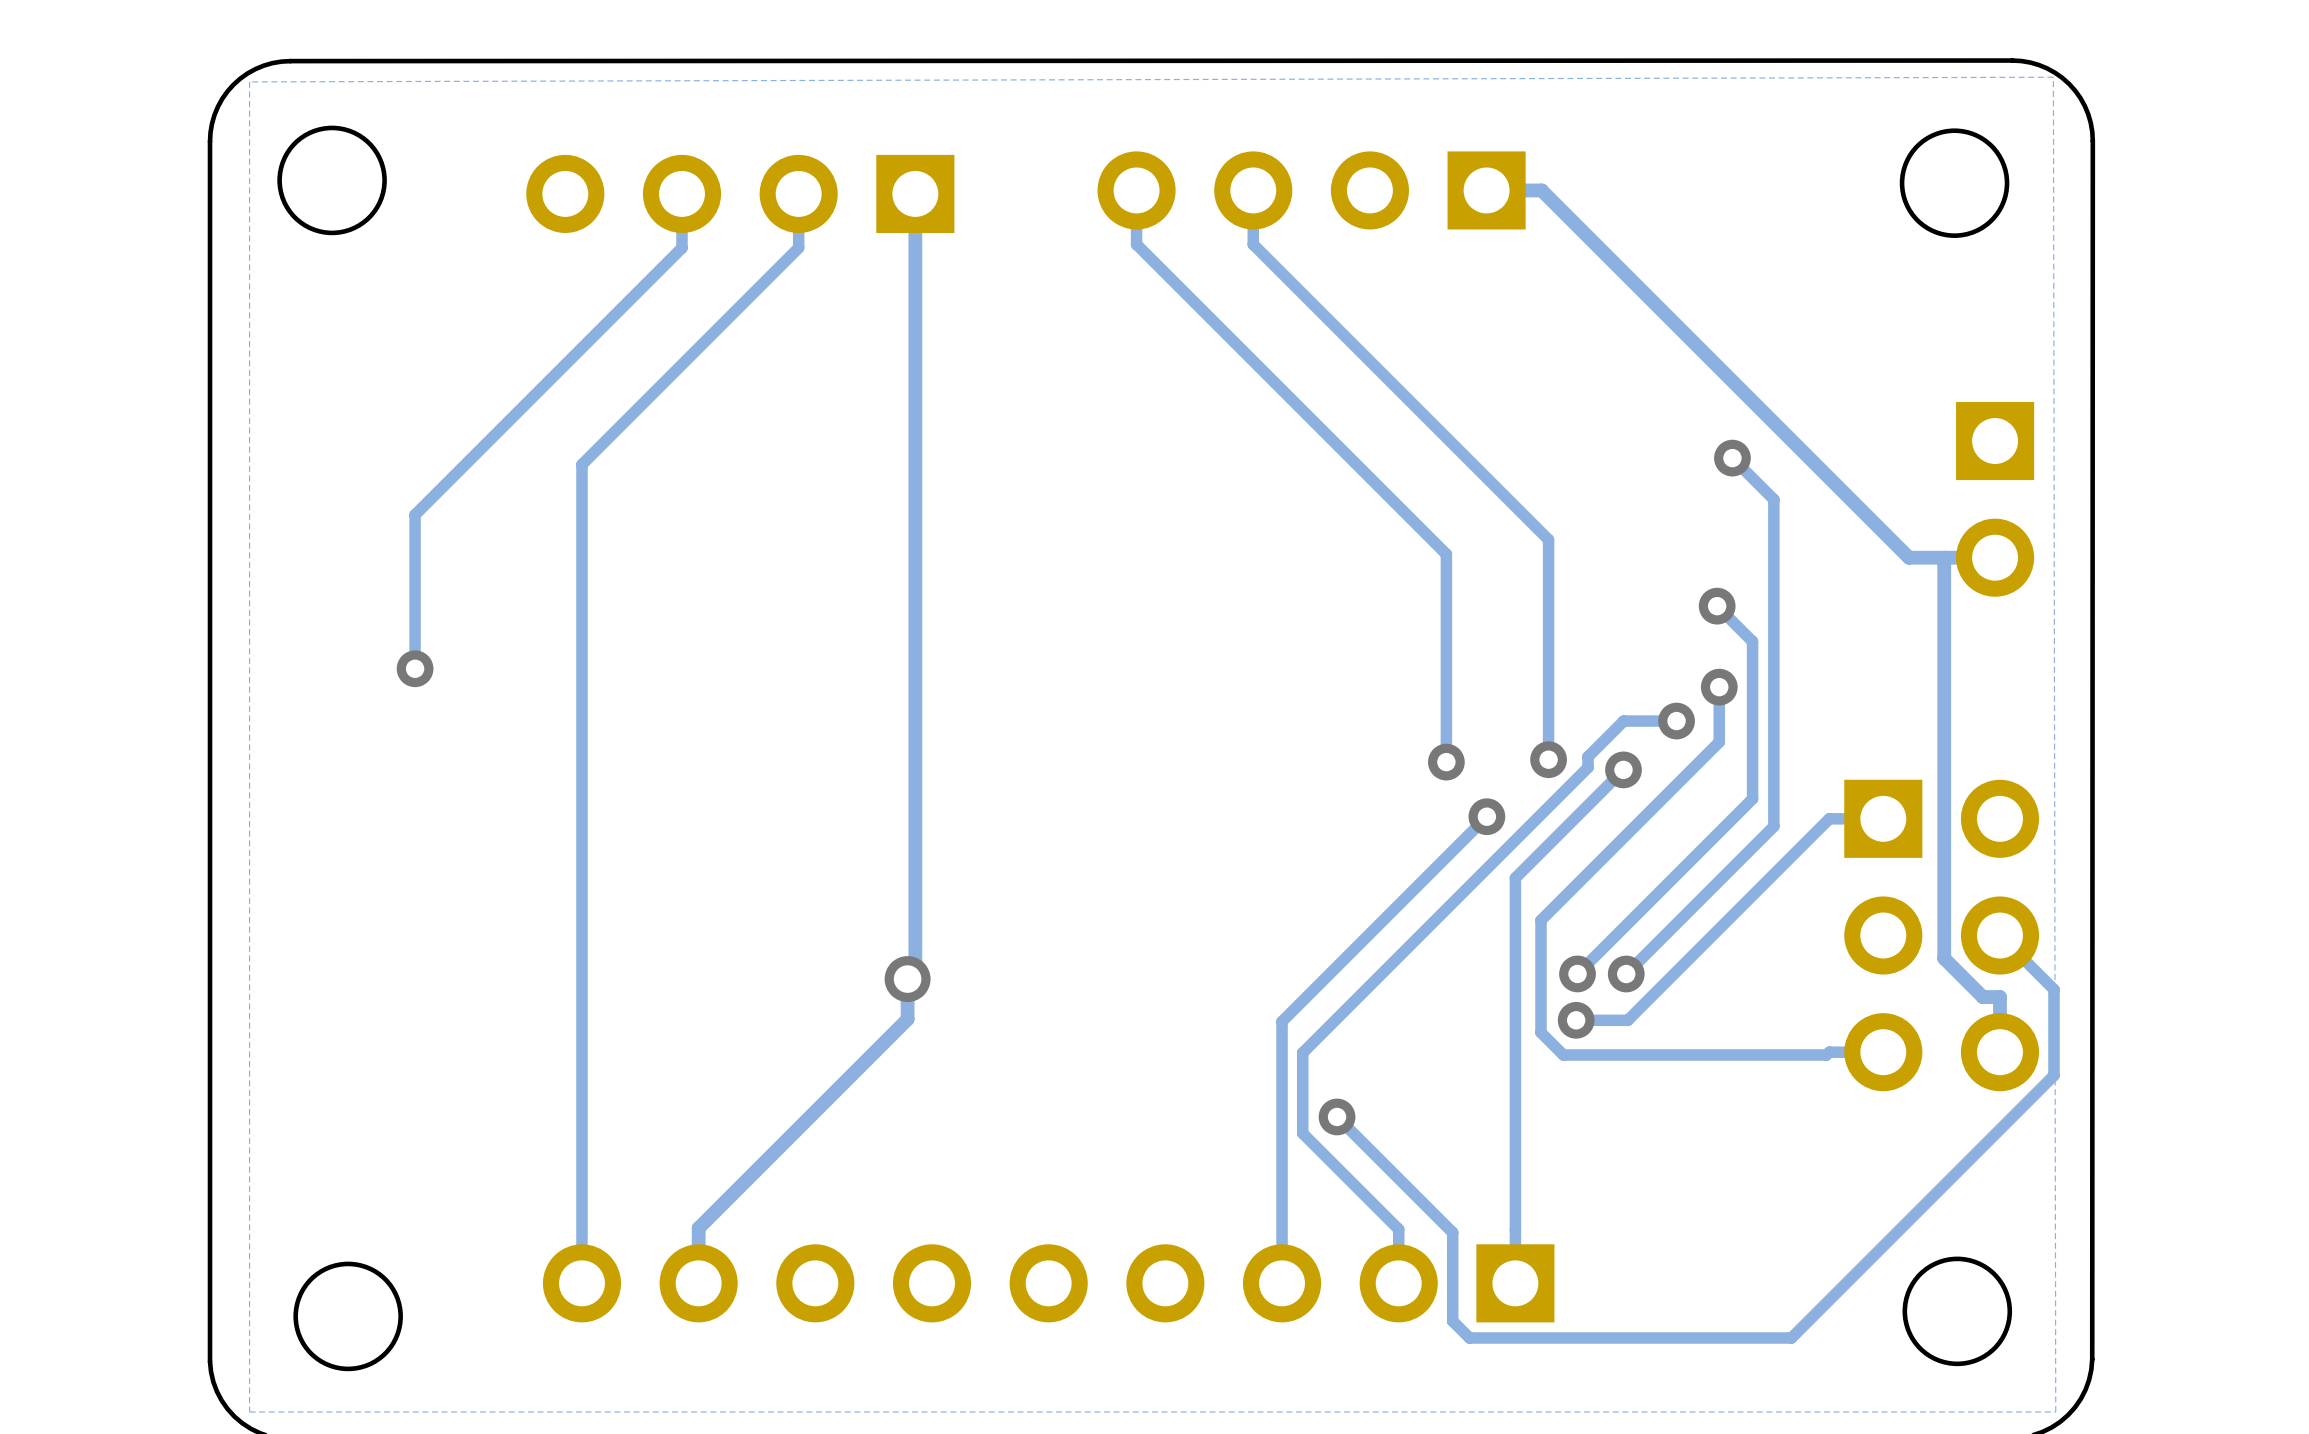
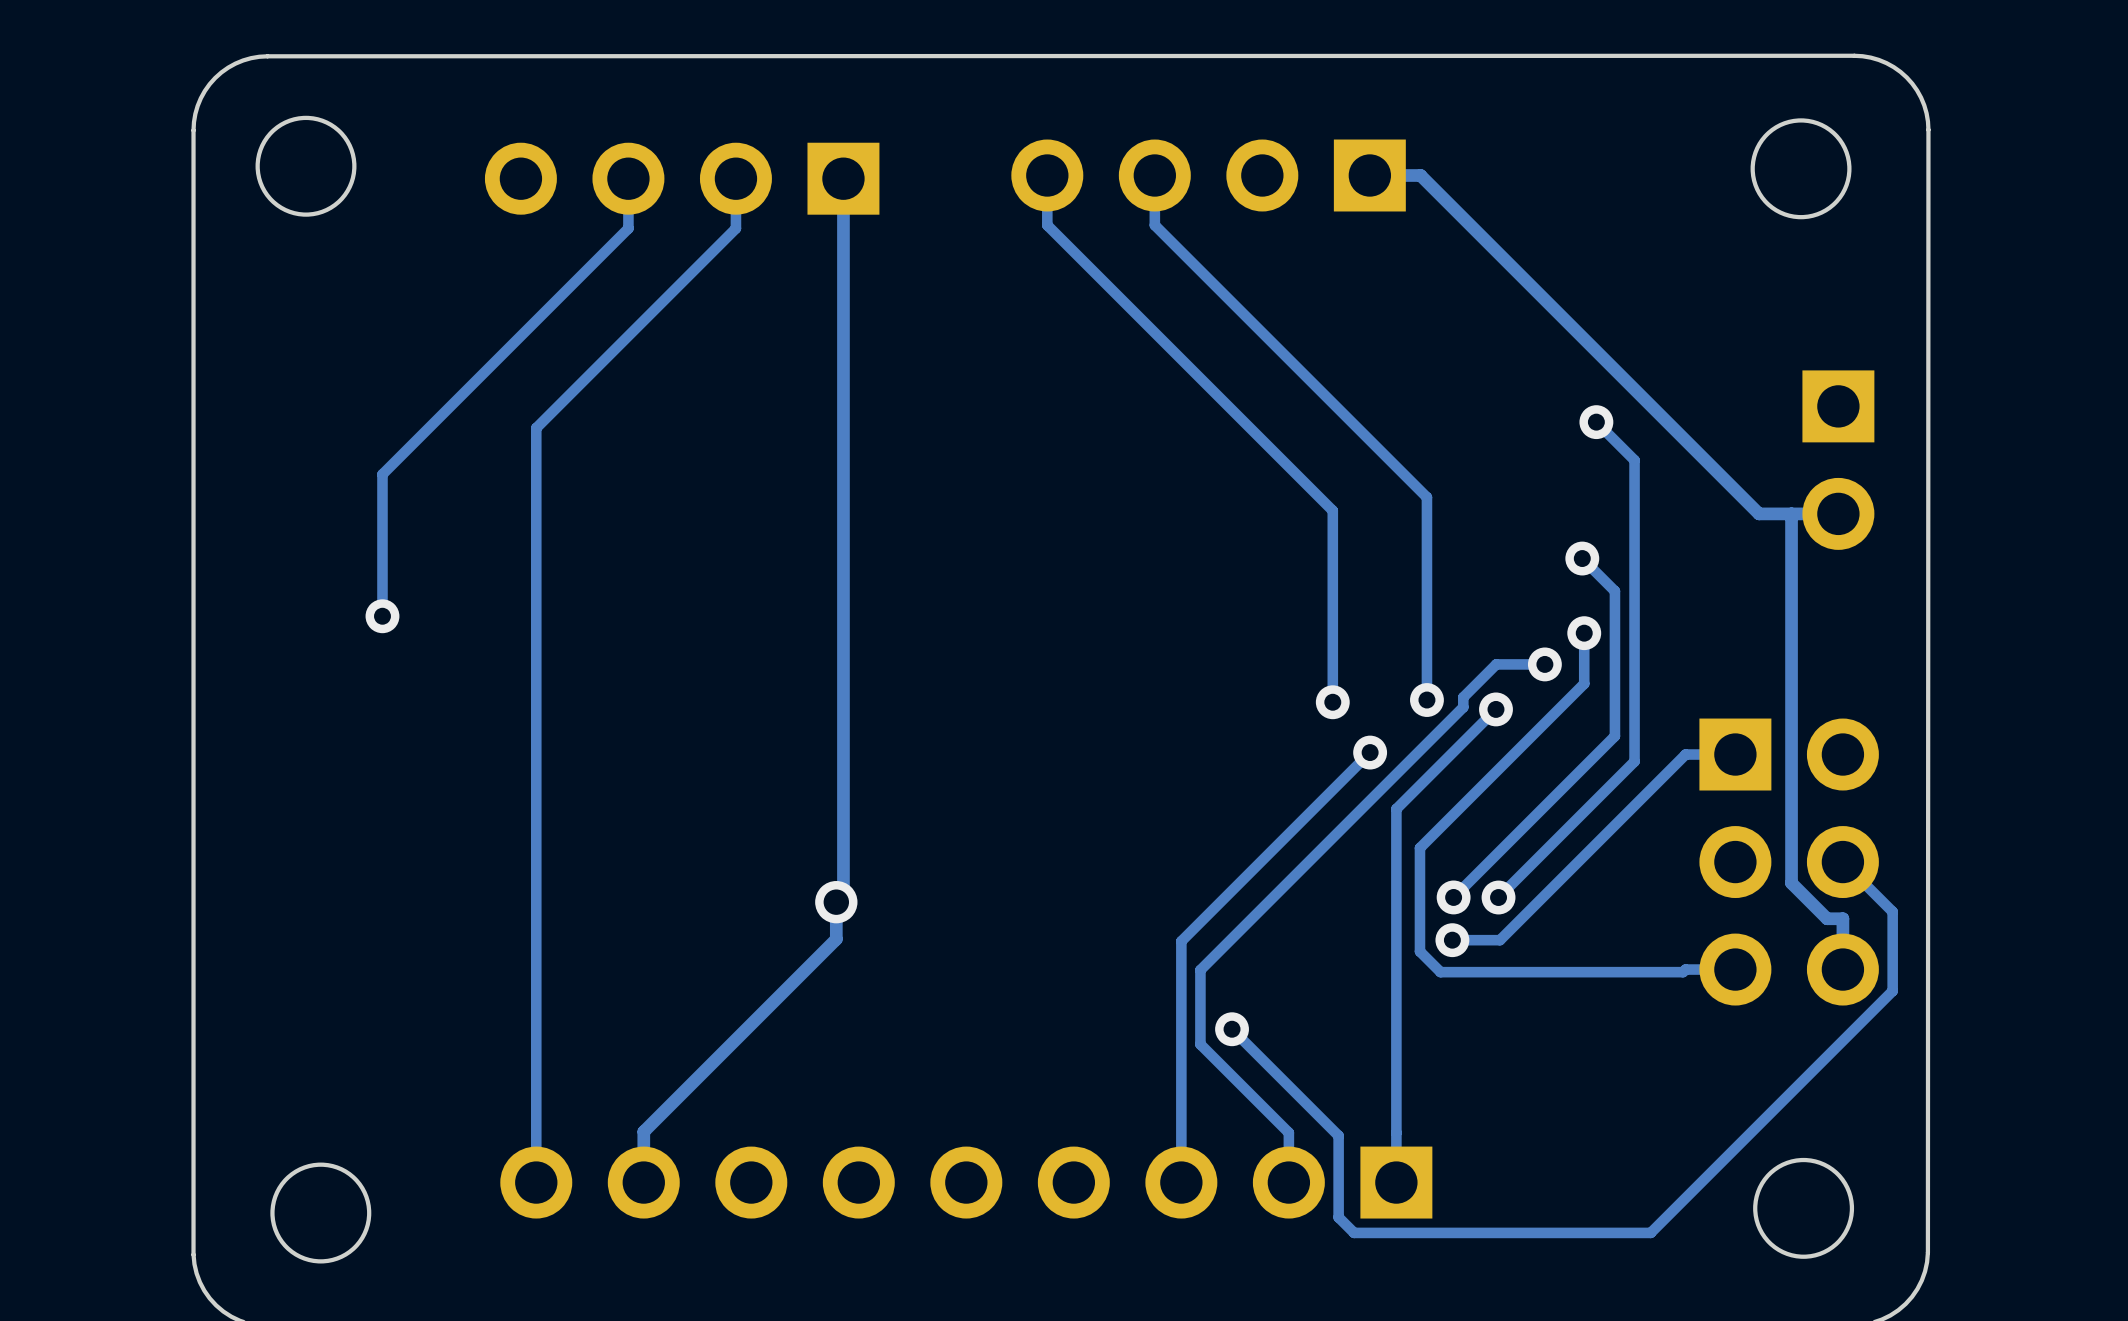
zone outline: (2053, 77) (2055, 1412) (249, 1412) (249, 81) (2053, 77) -> none

